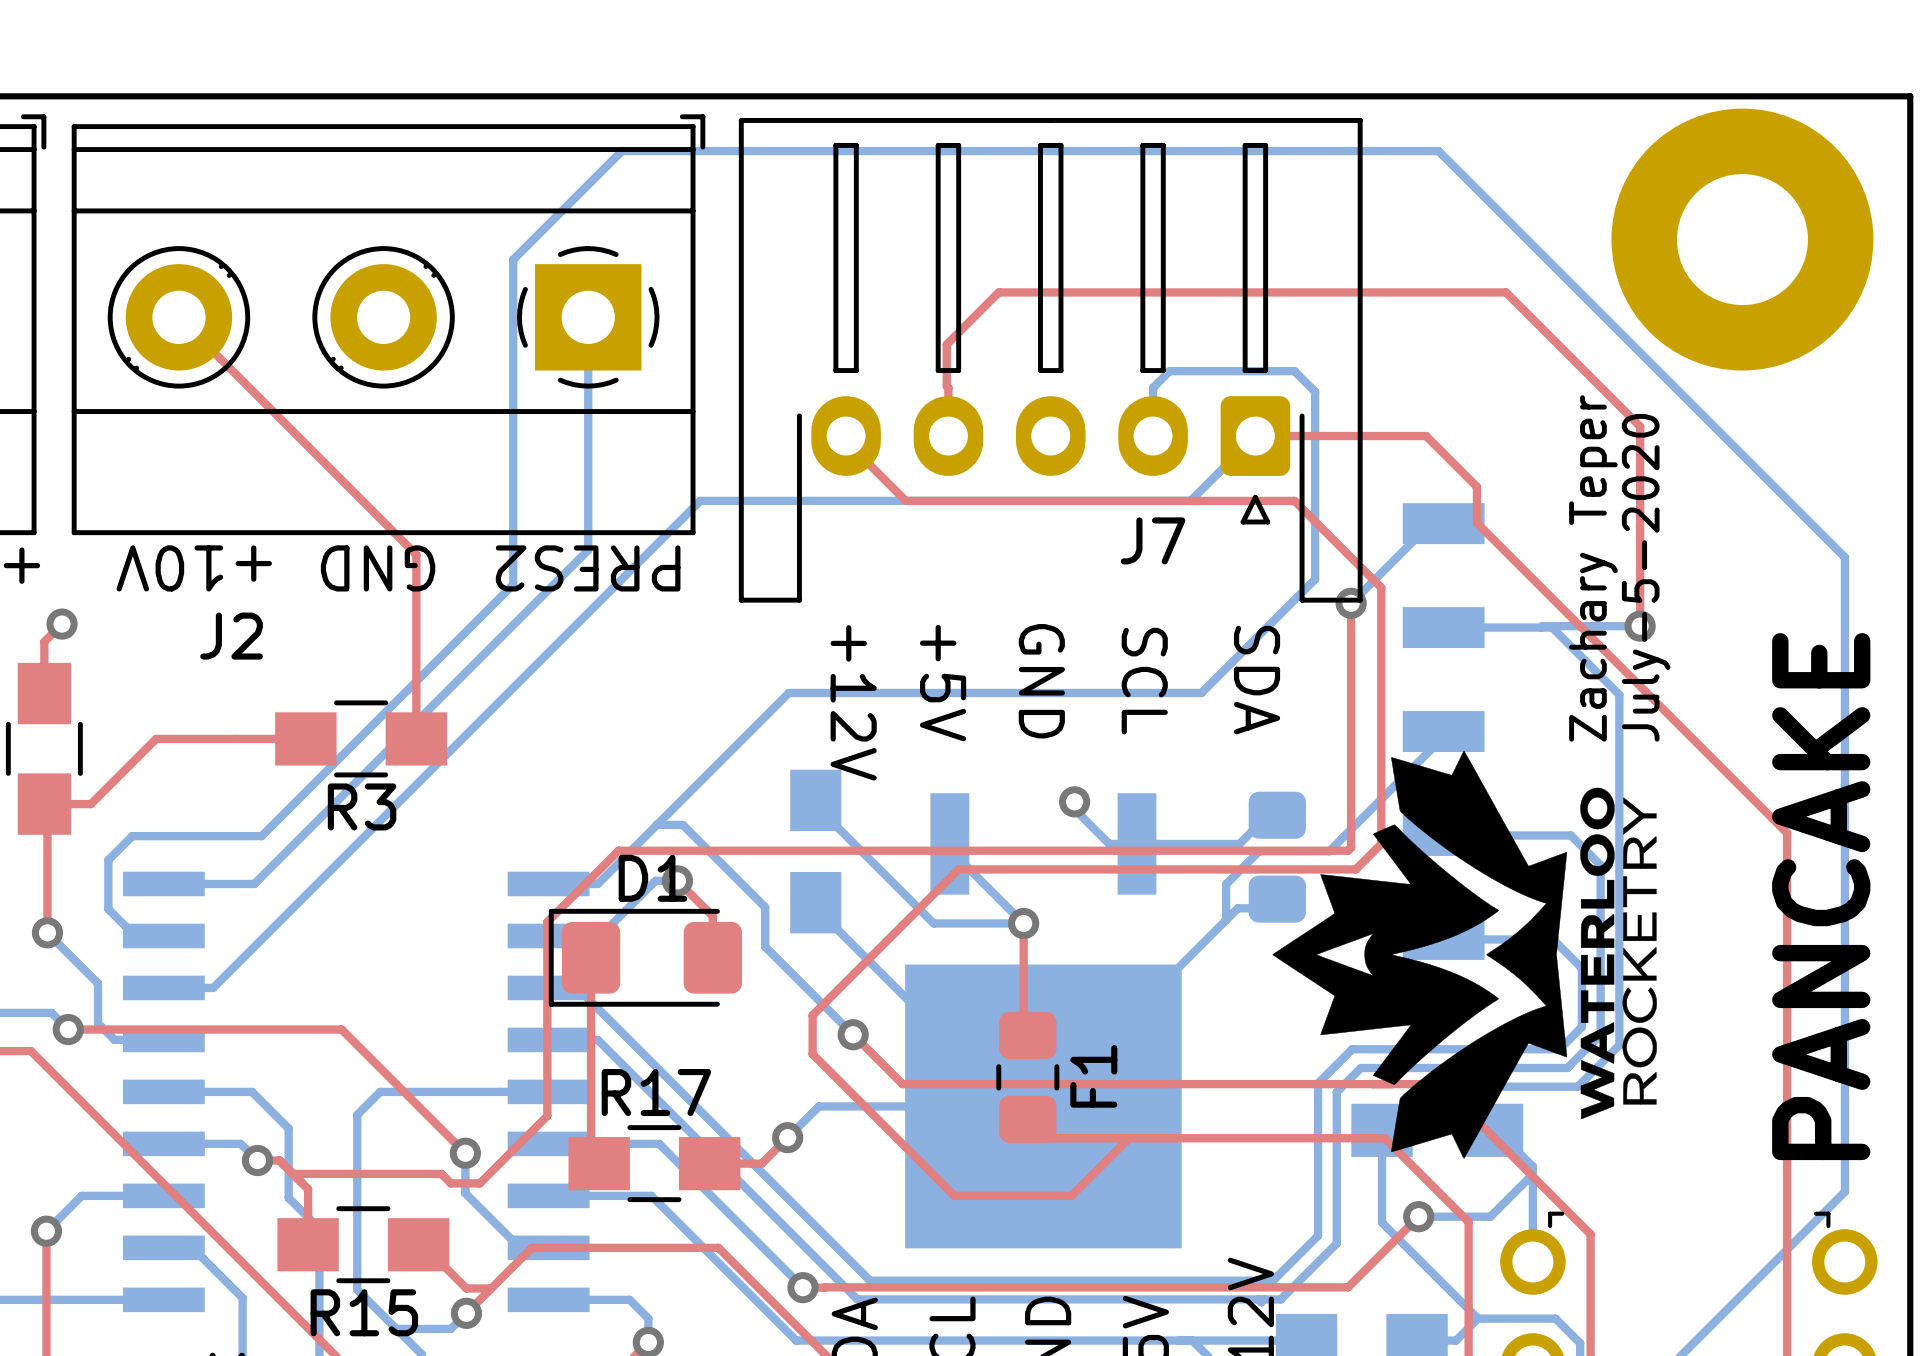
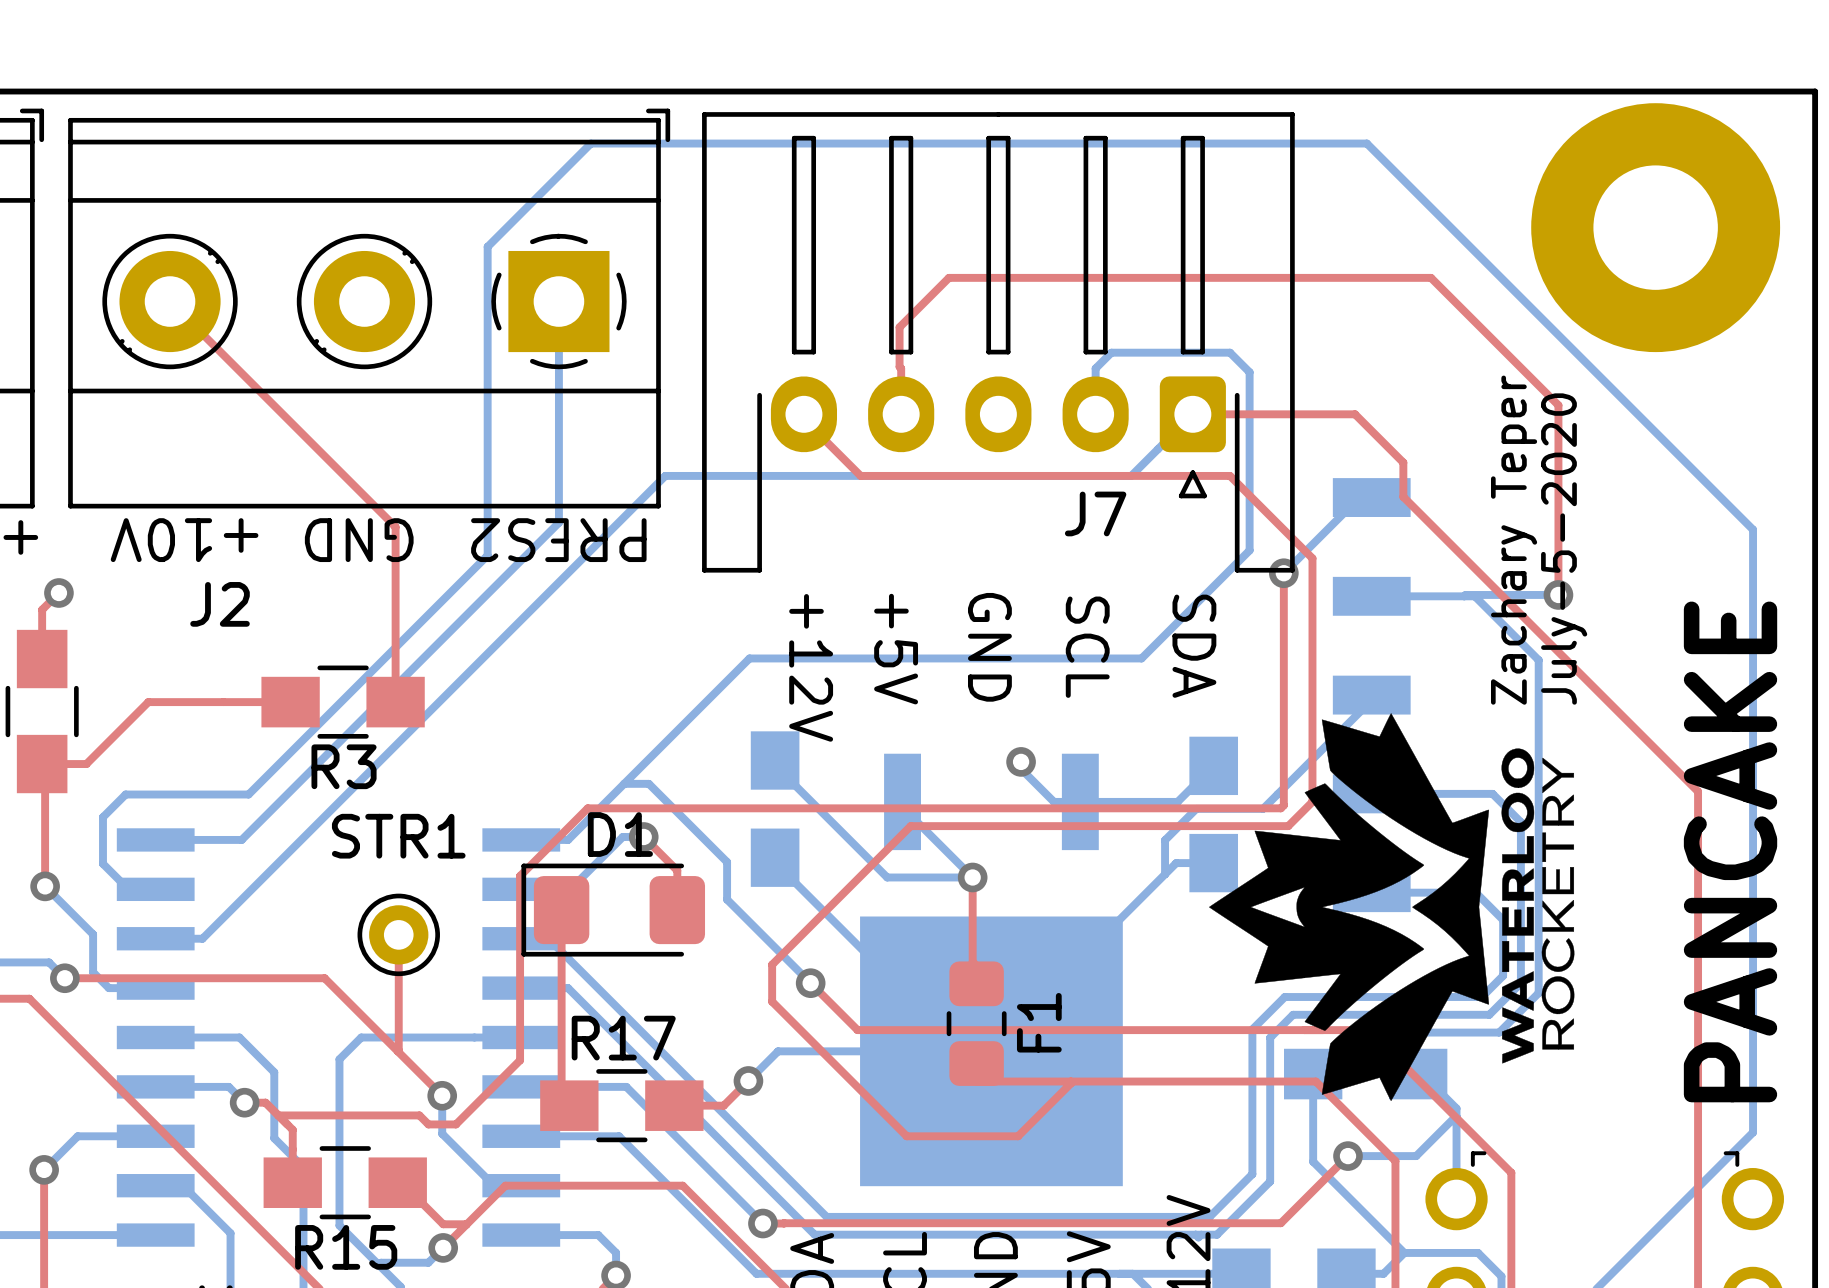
part footprint: [1248, 791, 1306, 923] -> [1189, 736, 1239, 893]
top track: none -> (398, 934) (397, 1051)
STR1: none -> (398, 934)

